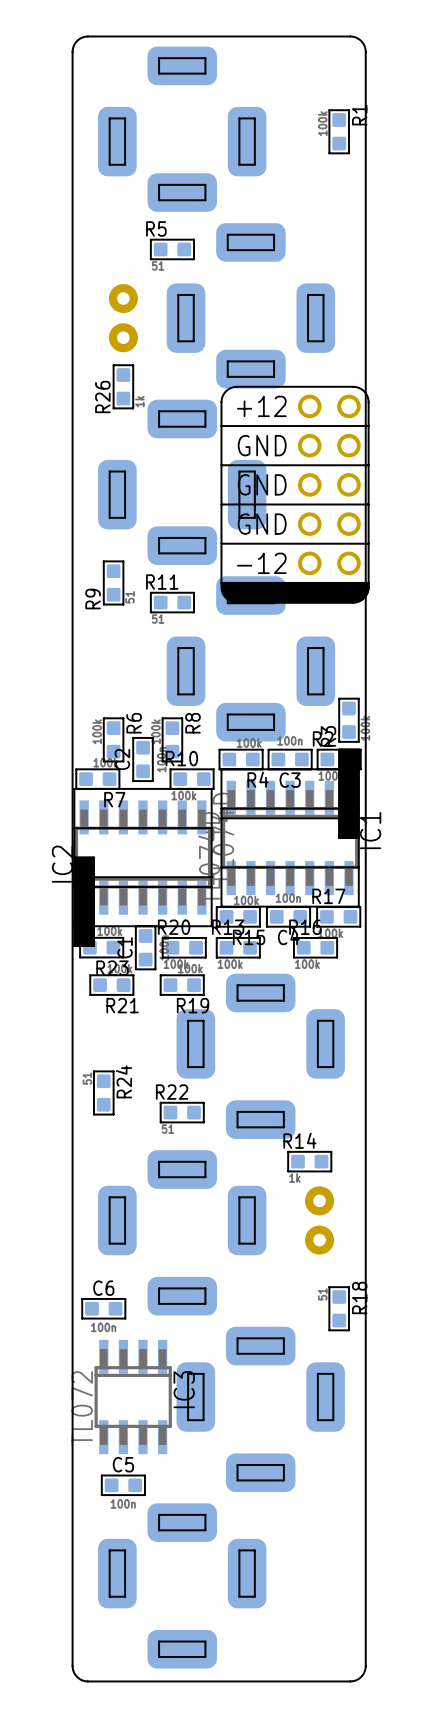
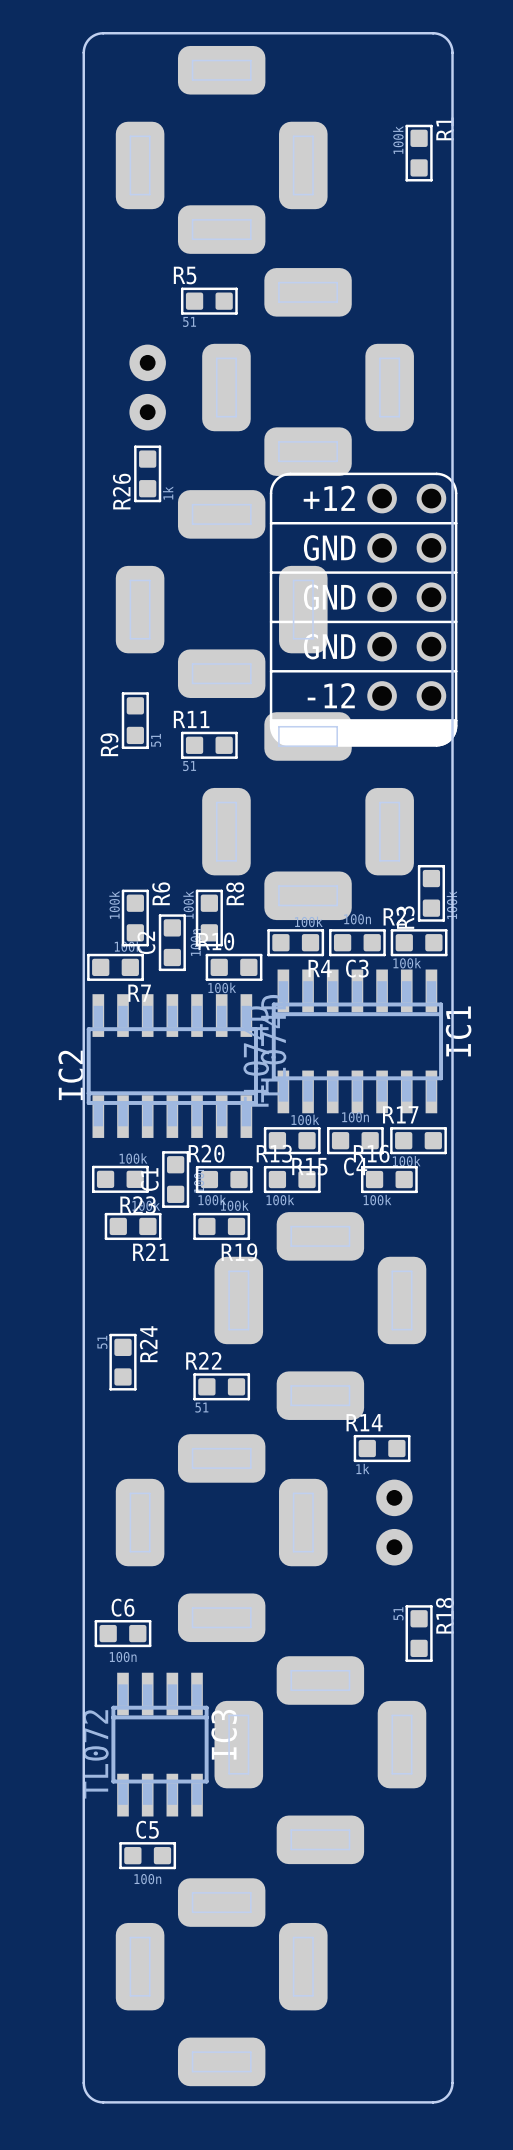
IC1 footprint: [220, 748, 360, 908] -> [271, 969, 444, 1114]
IC2 footprint: [73, 787, 213, 947] -> [86, 994, 258, 1138]

